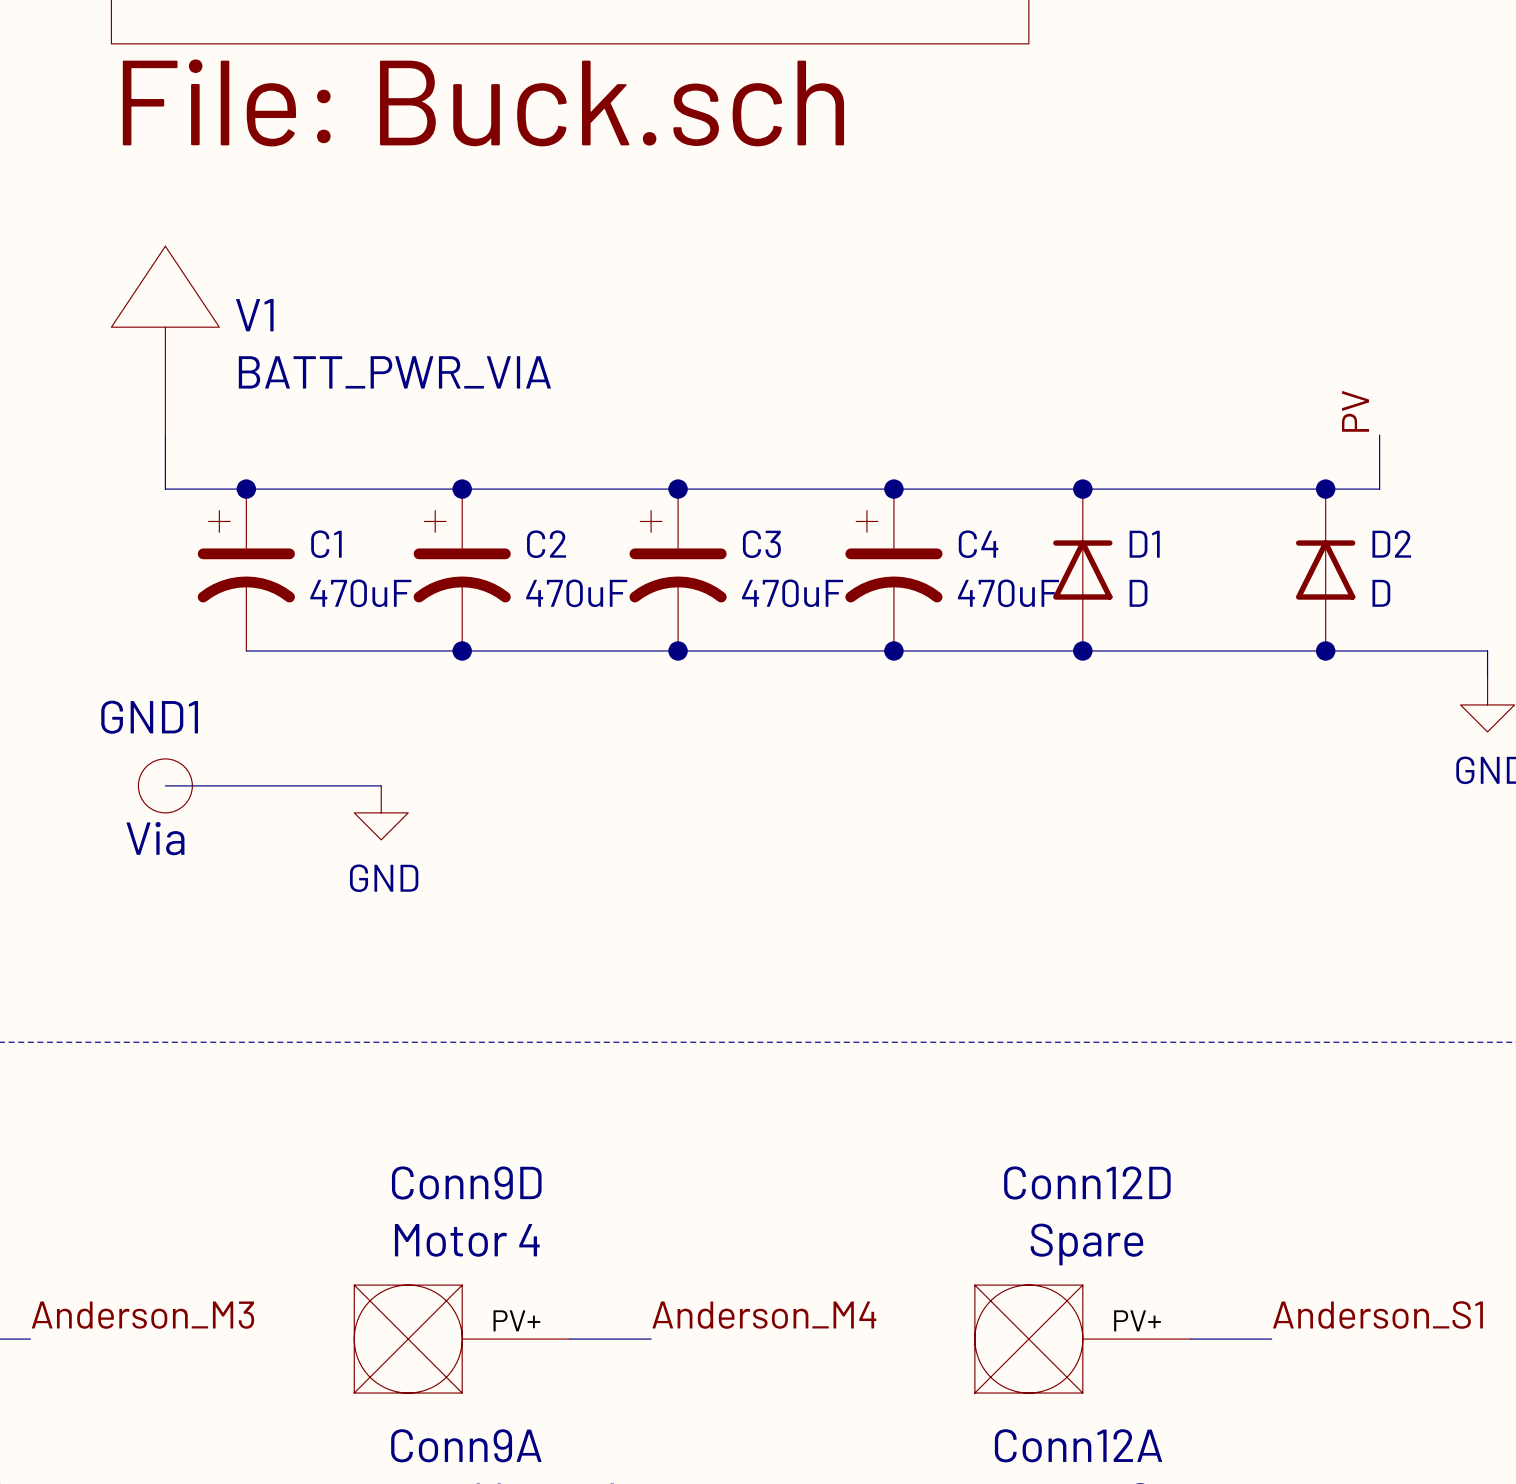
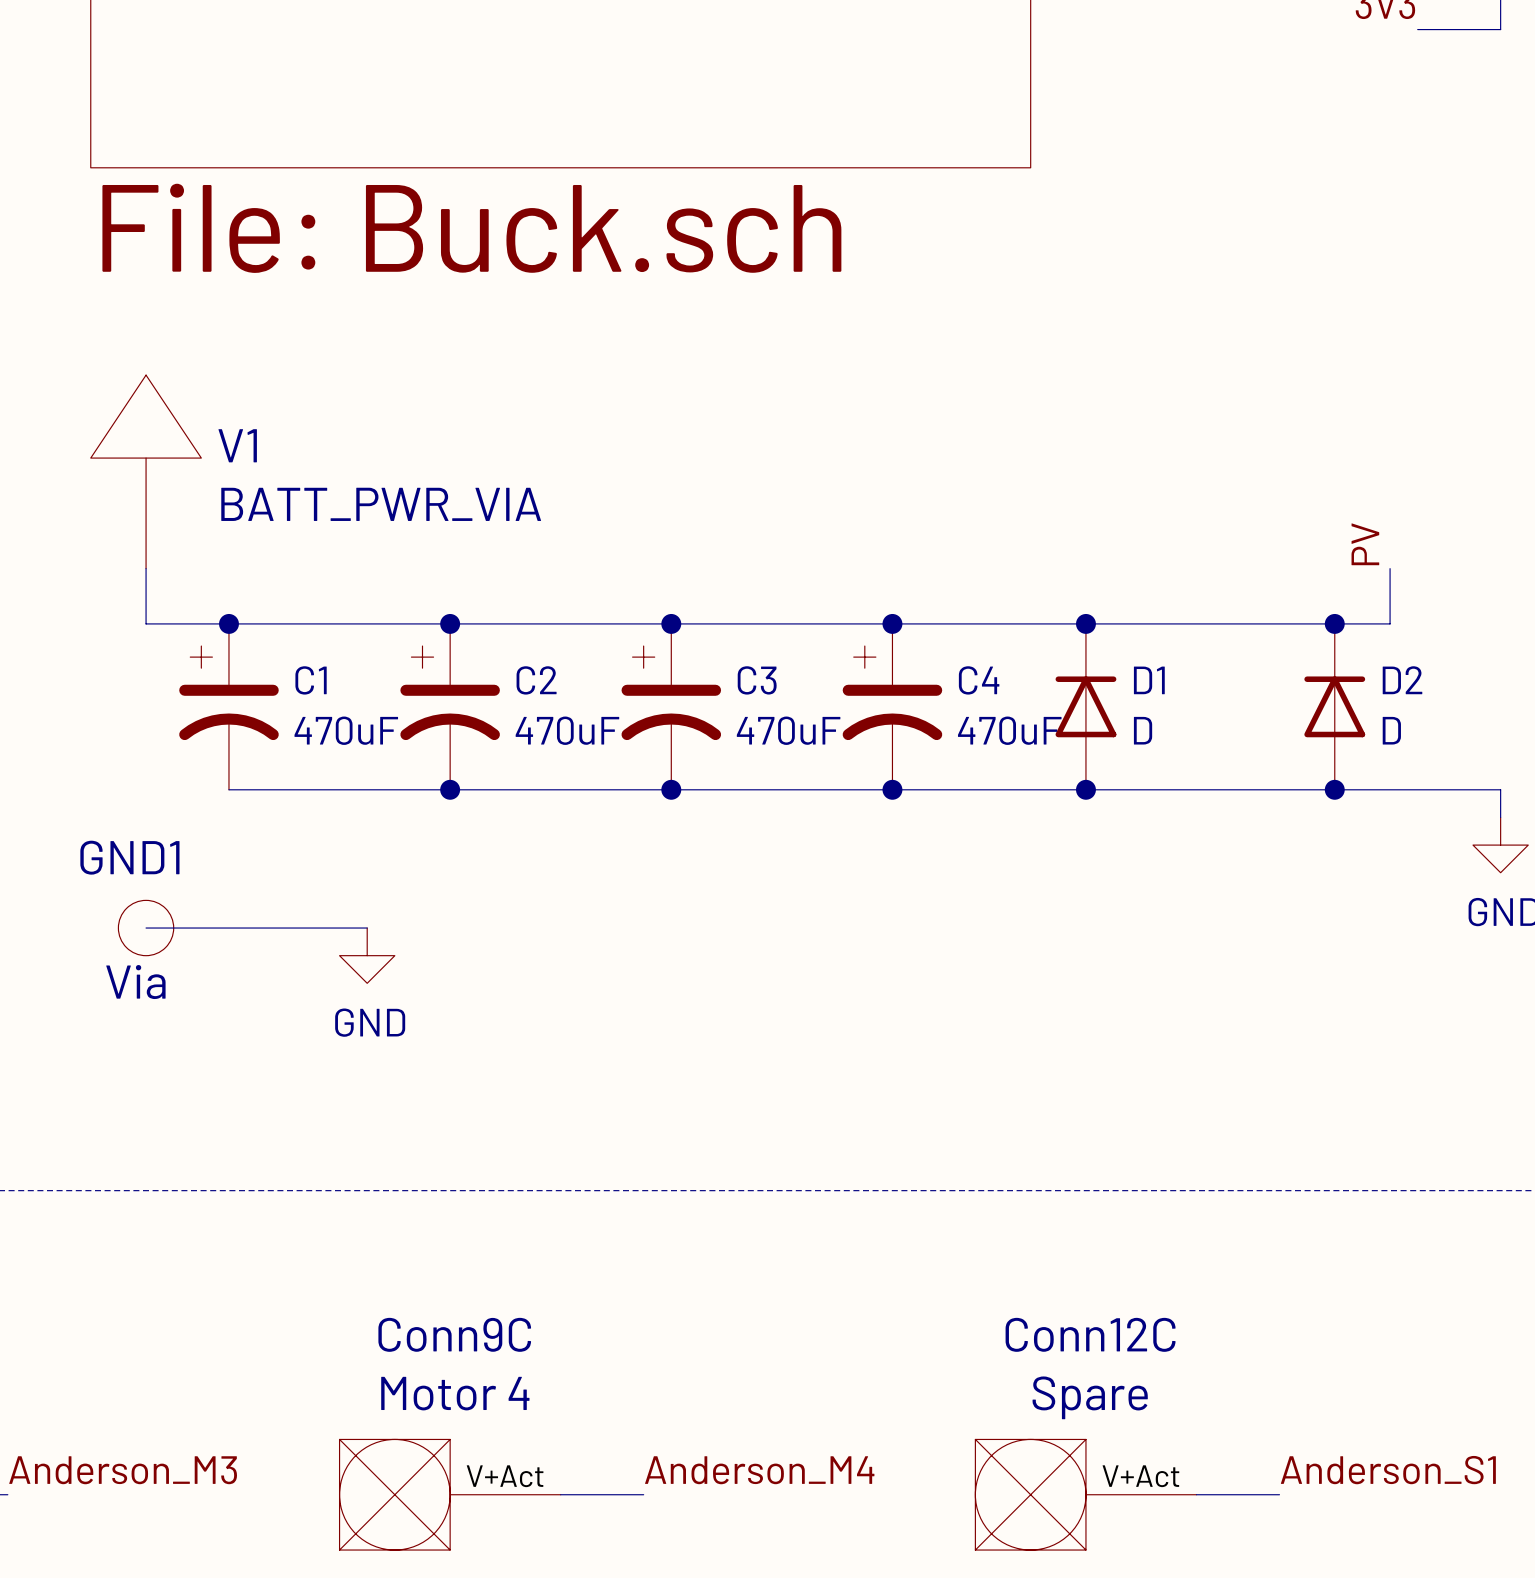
Conn9D name: Conn9D (466, 1182) -> Conn9C (454, 1334)
Conn12D name: Conn12D (1087, 1182) -> Conn12C (1090, 1334)
Conn9D pin name: PV+ (516, 1320) -> V+Act (505, 1476)
Conn12D pin name: PV+ (1137, 1320) -> V+Act (1140, 1476)

